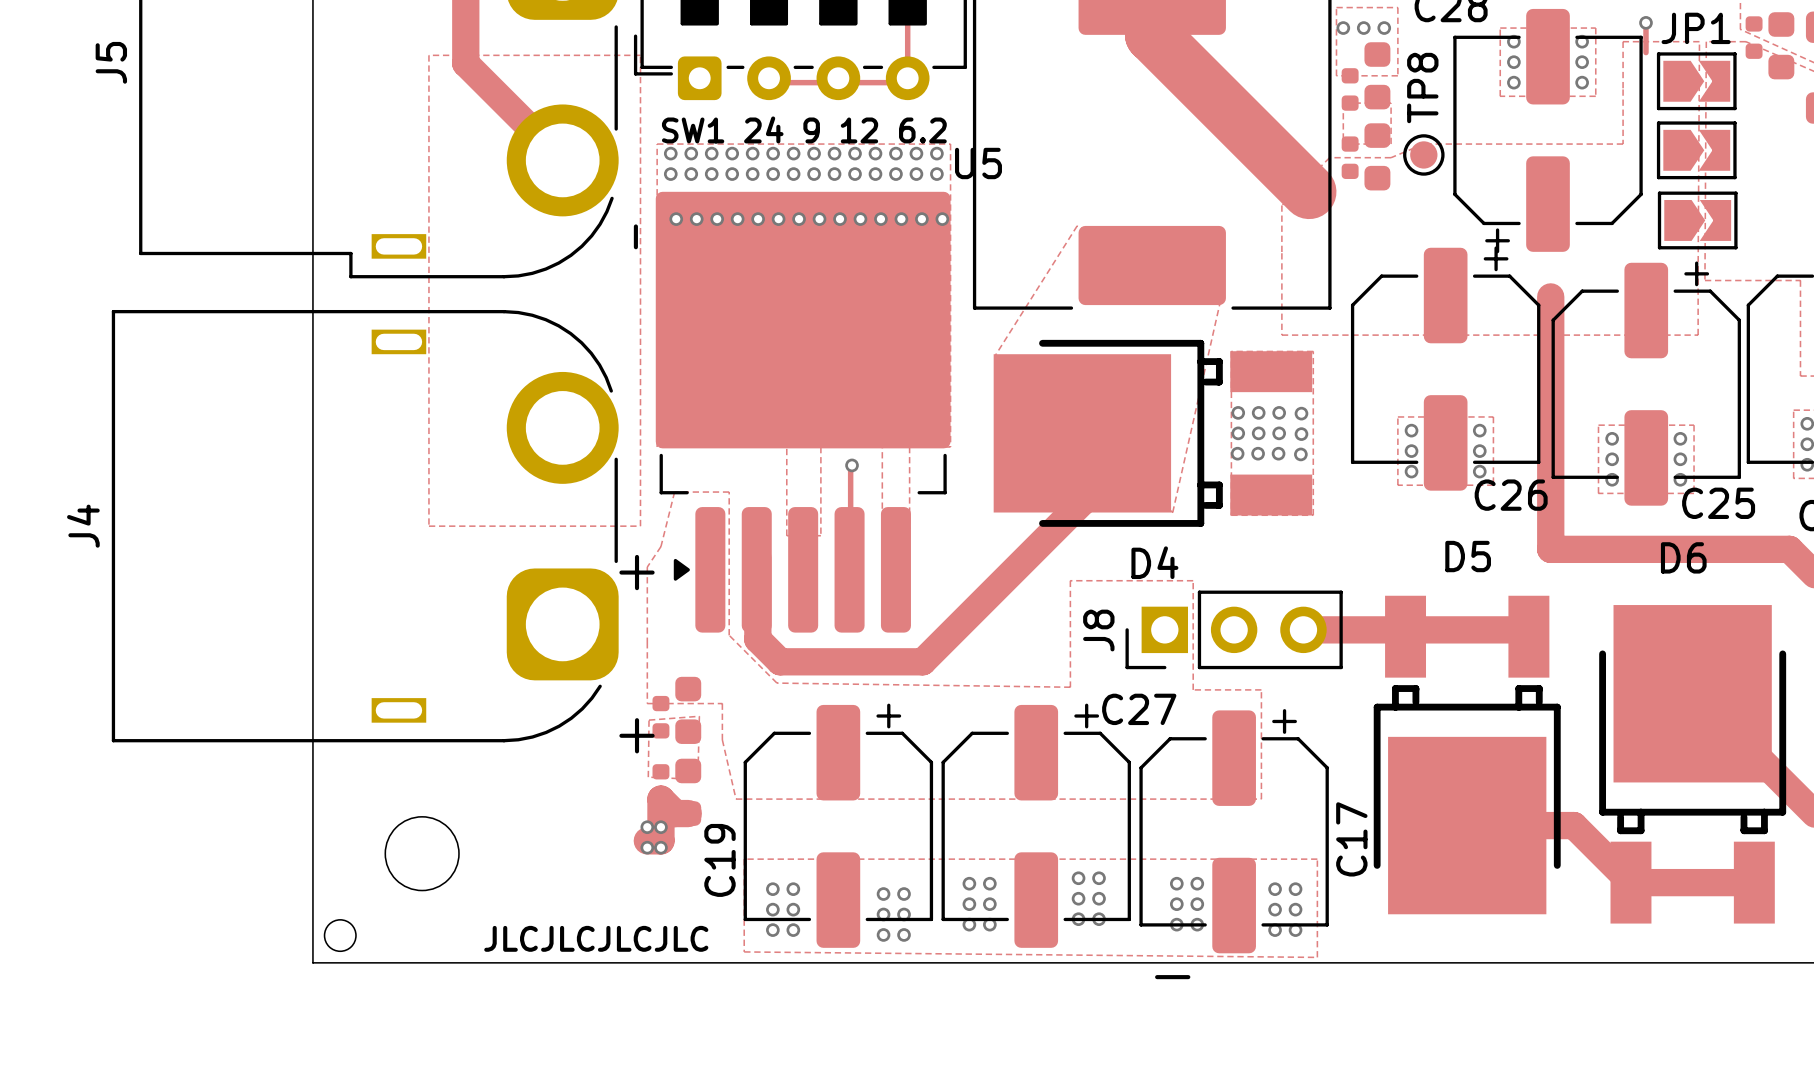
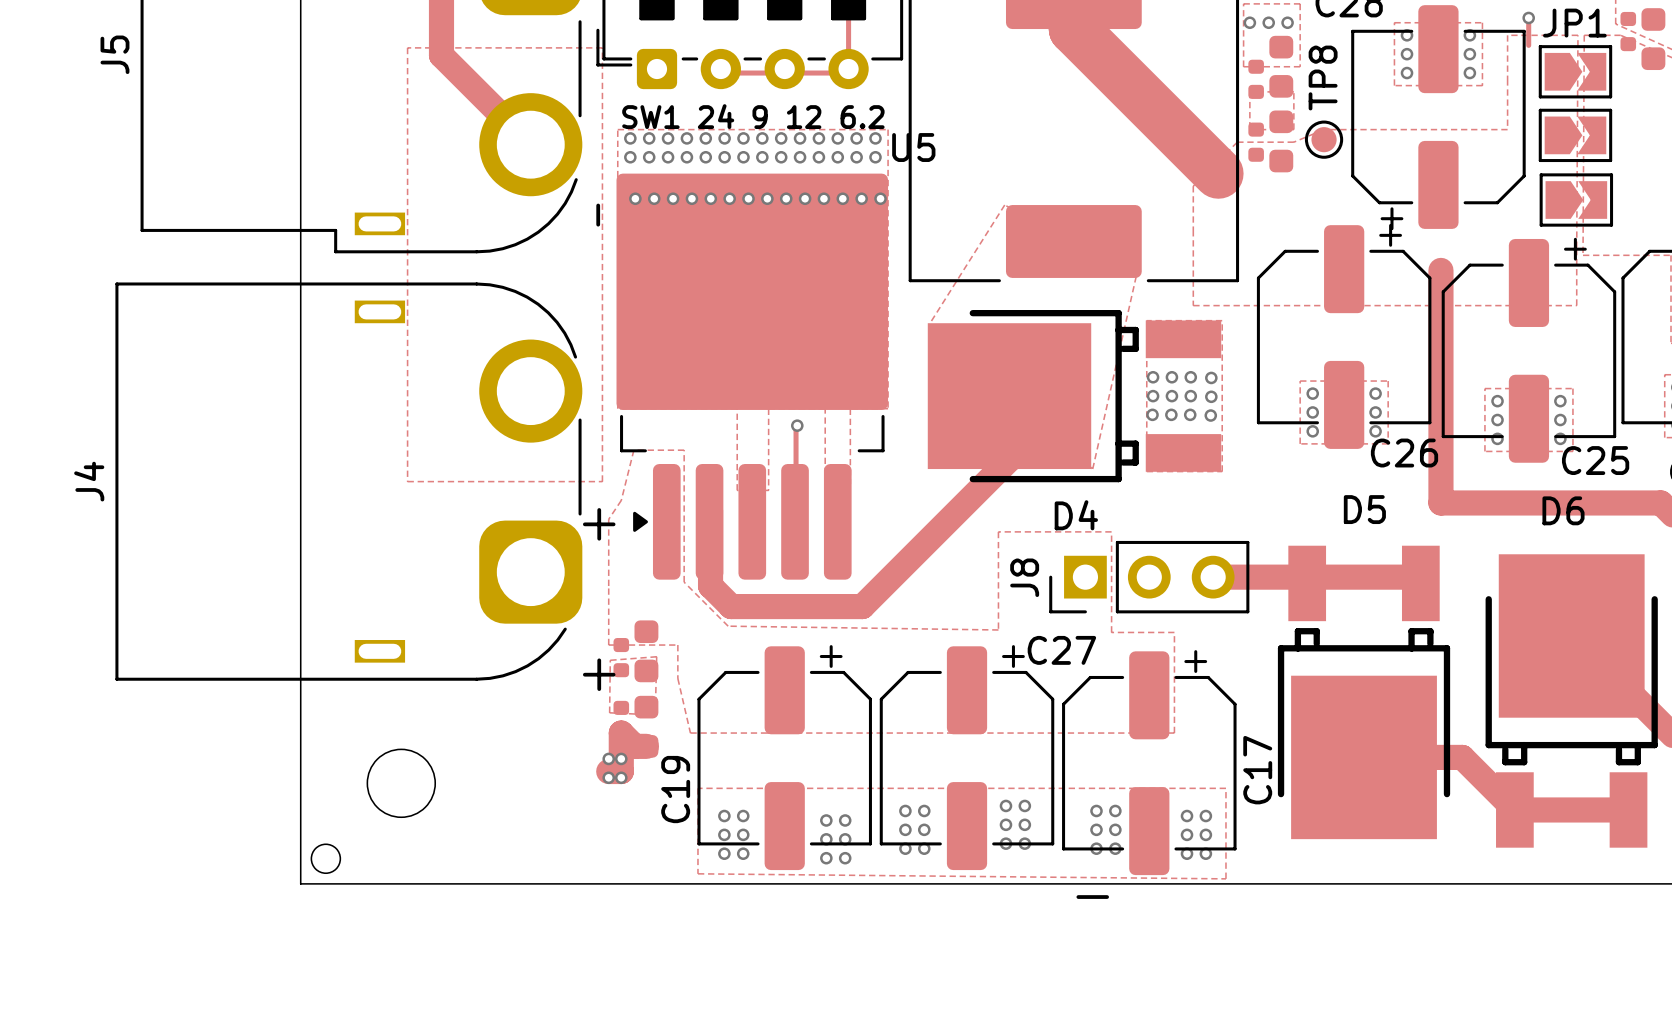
drawing: [484, 925, 709, 952] -> none

